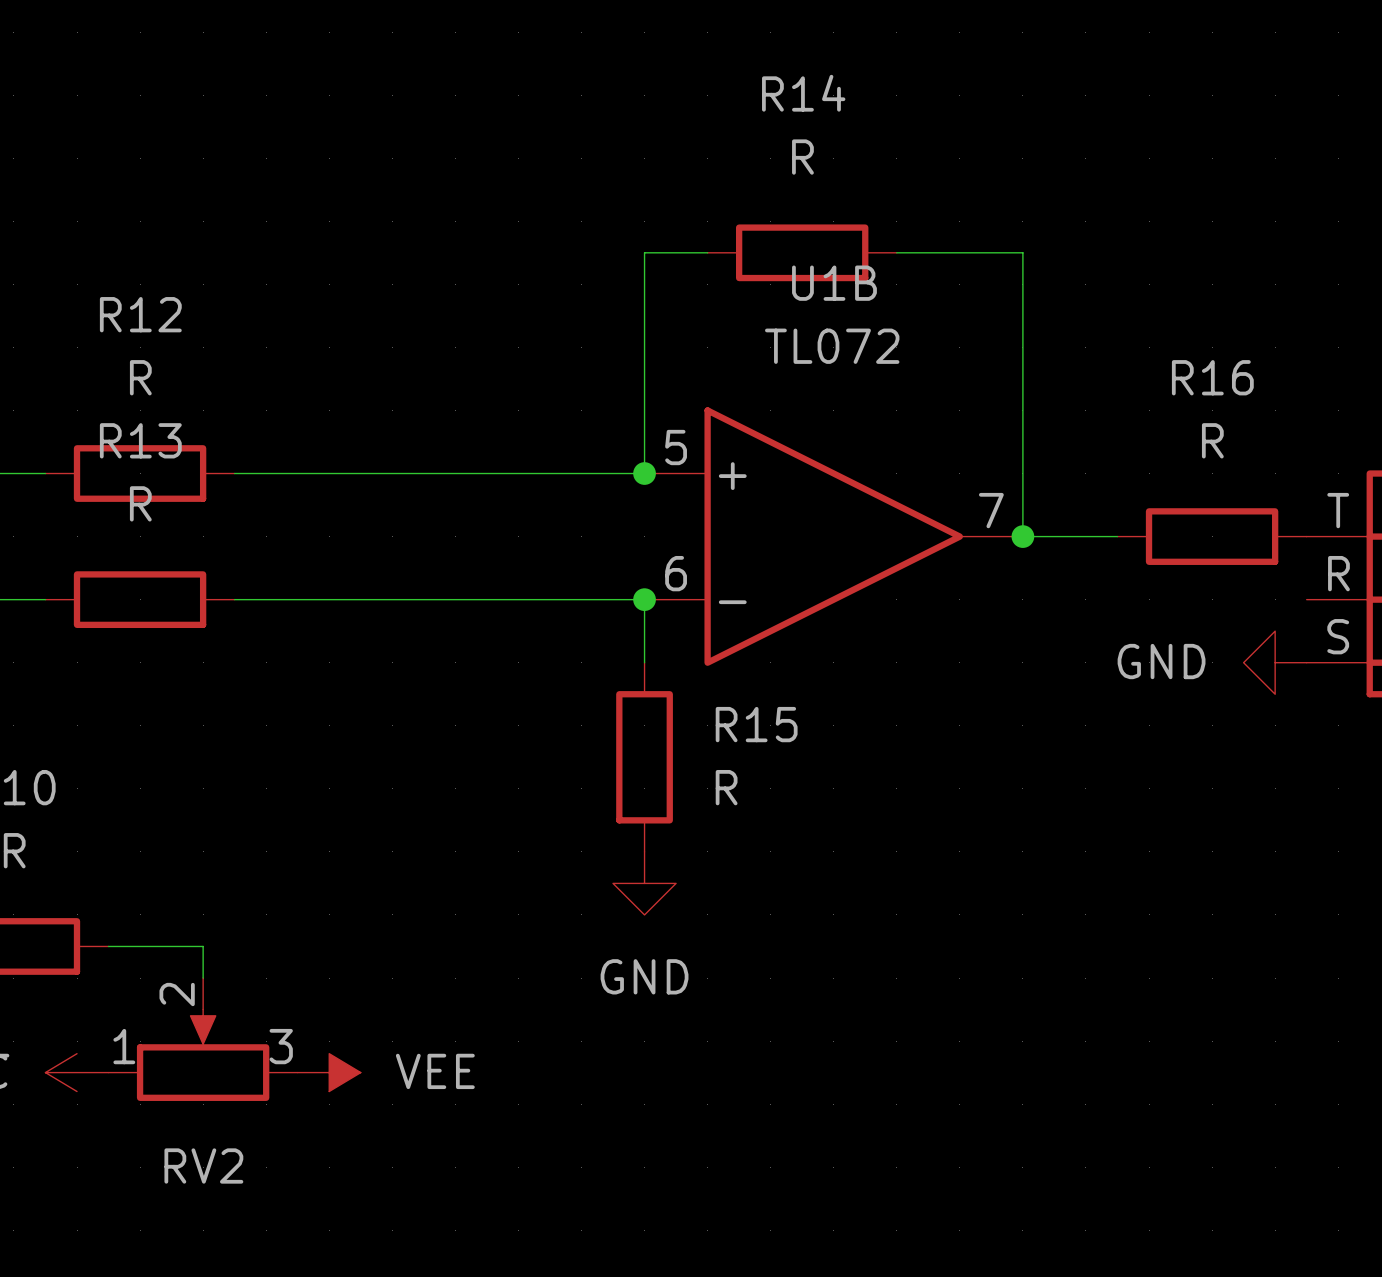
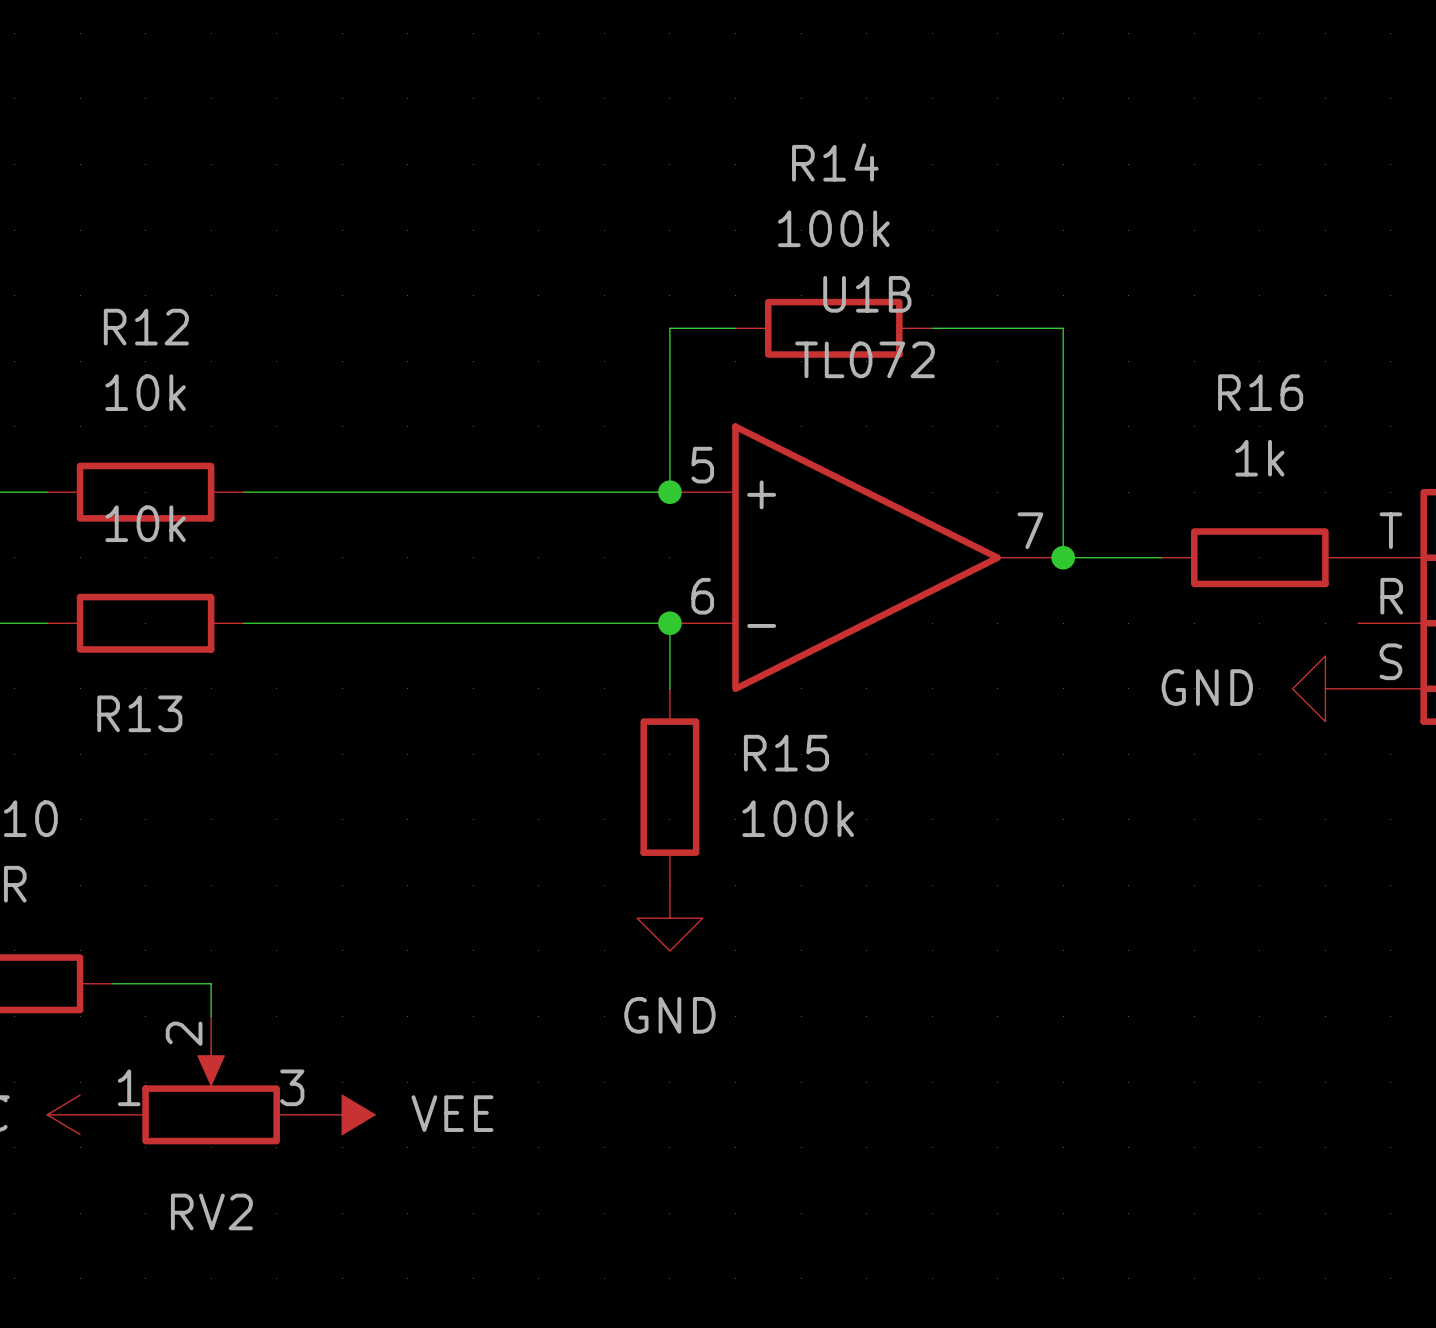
R14 value: R (802, 157) -> 100k (833, 228)
wire: (707, 252) (644, 252) (644, 315) -> (735, 328) (669, 328)
R14 position: (802, 252) -> (833, 328)
wire: (896, 252) (1022, 252) (1022, 315) -> (932, 328) (1063, 328)
R12 value: R (140, 377) -> 10k (145, 392)
R13 name position: R13 (140, 440) -> R13 (139, 713)
R16 value: R (1212, 440) -> 1k (1259, 458)
R13 value: R (140, 503) -> 10k (145, 523)
R15 value: R (726, 787) -> 100k (798, 818)

